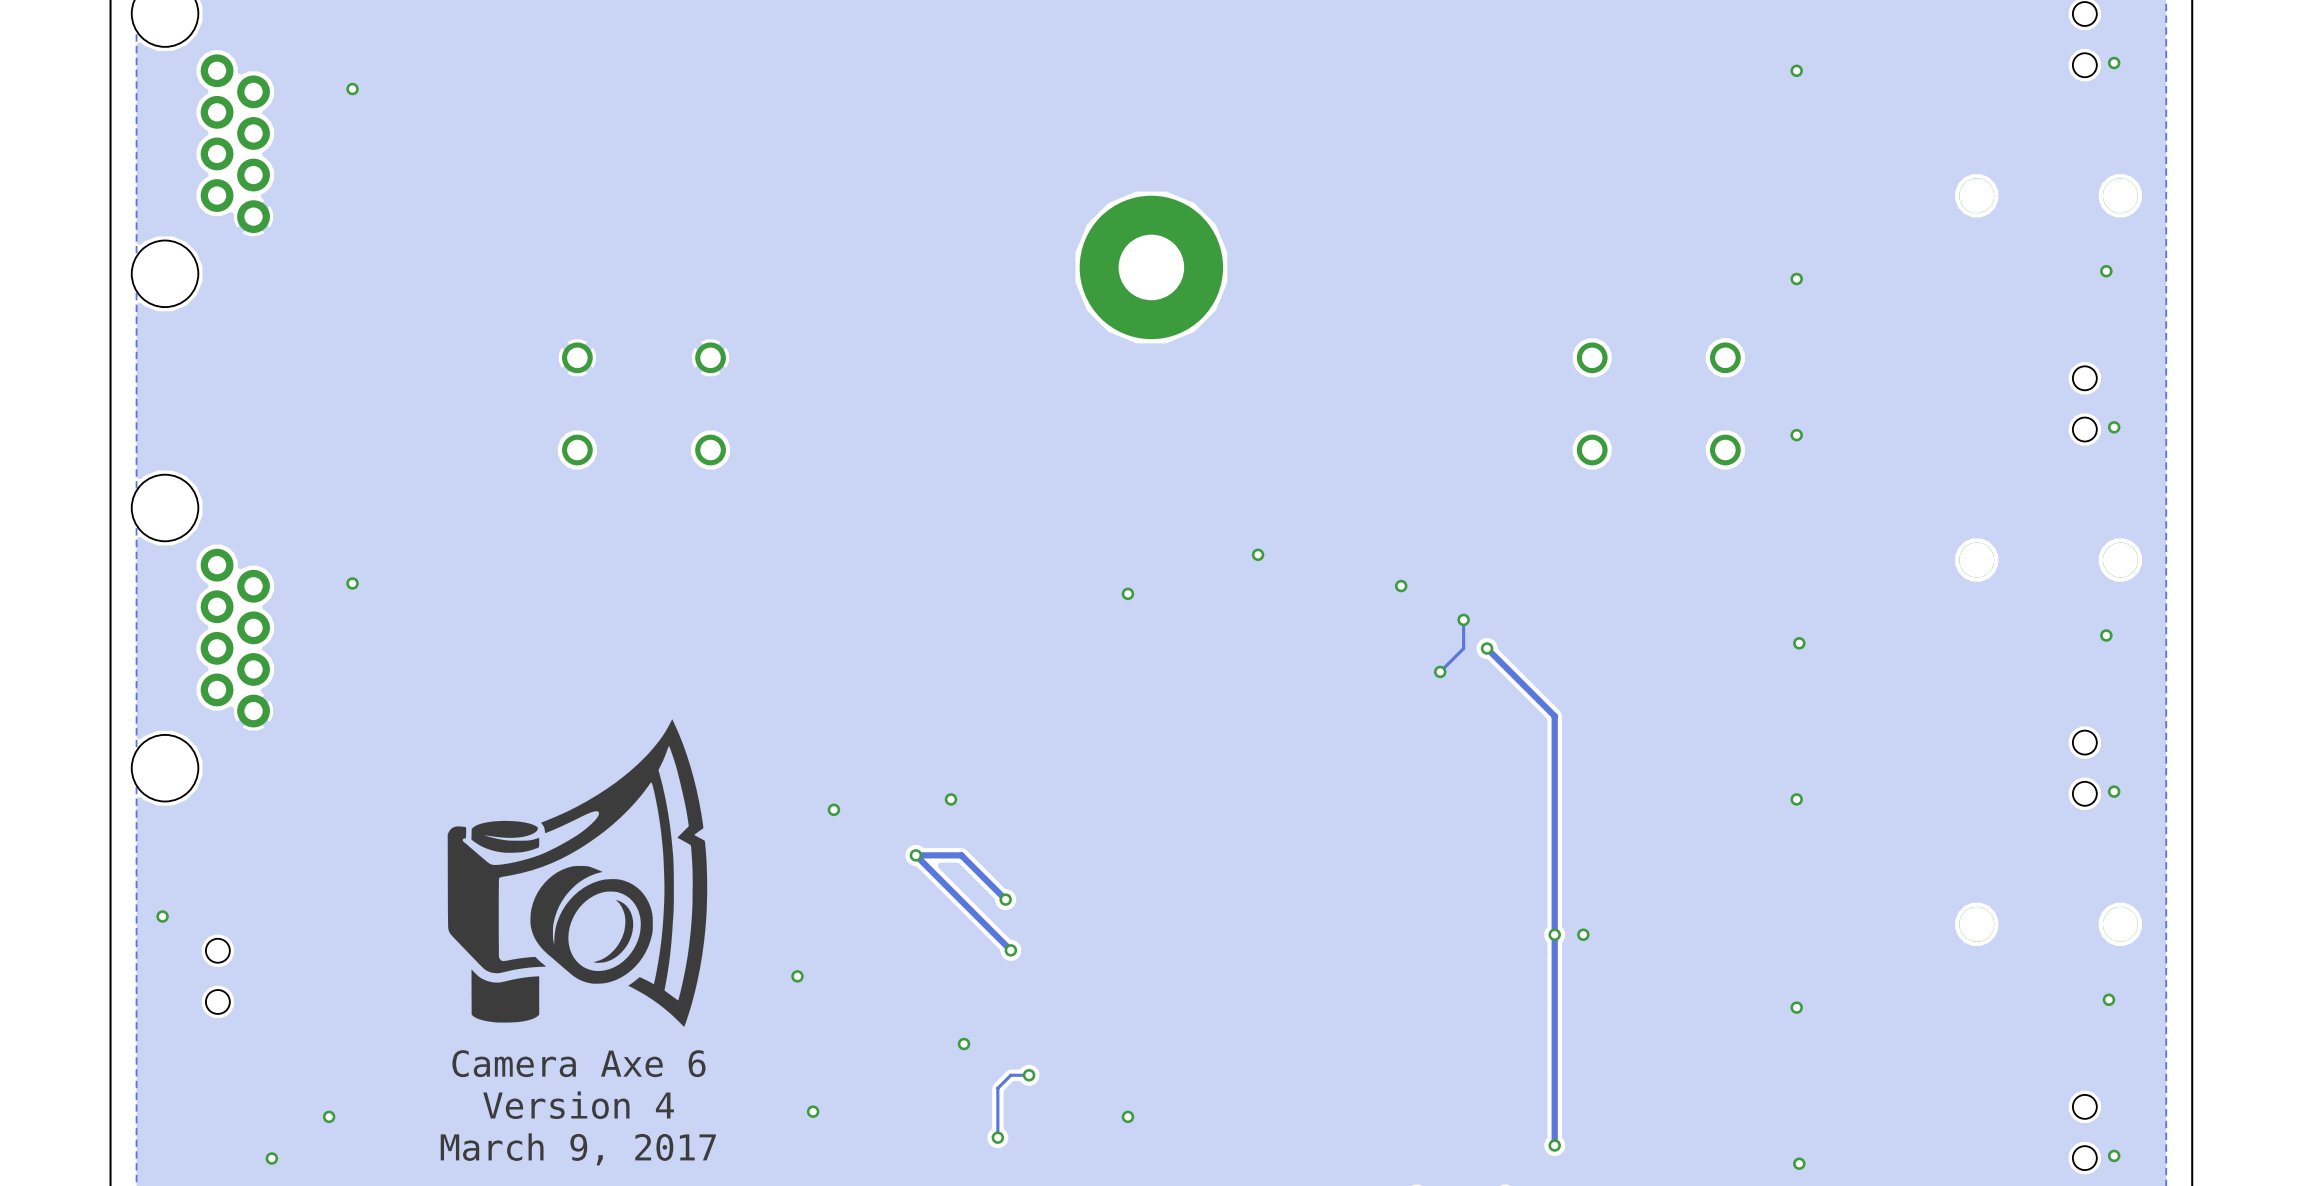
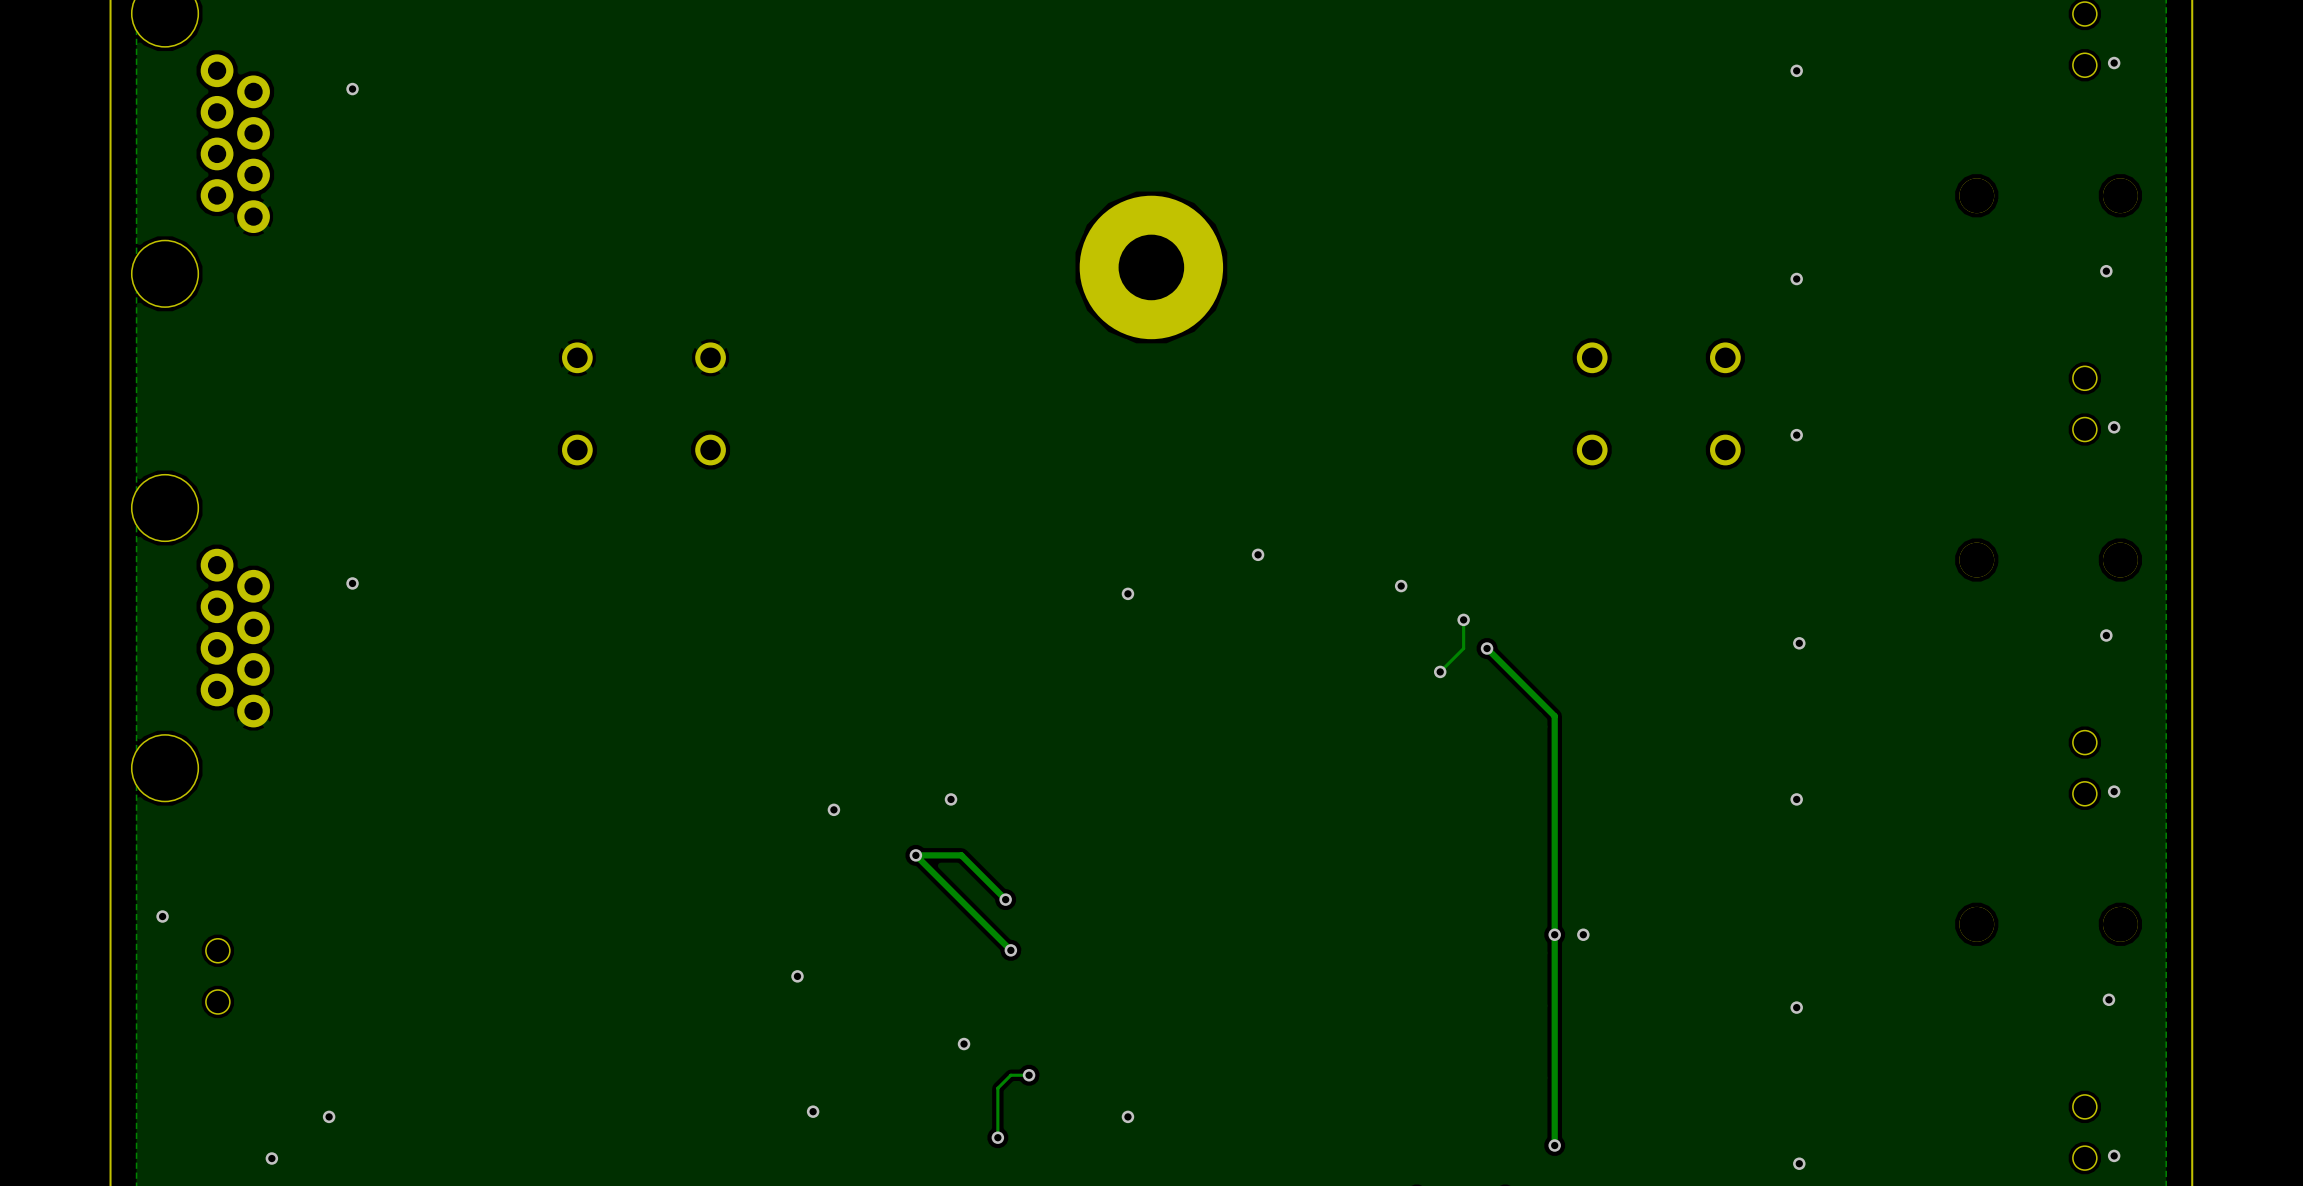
drawing: [447, 719, 708, 1027] -> none
text: Camera Axe 6 (578, 1063) -> none
text: Version 4 (578, 1105) -> none
text: March 9, 2017 (578, 1149) -> none

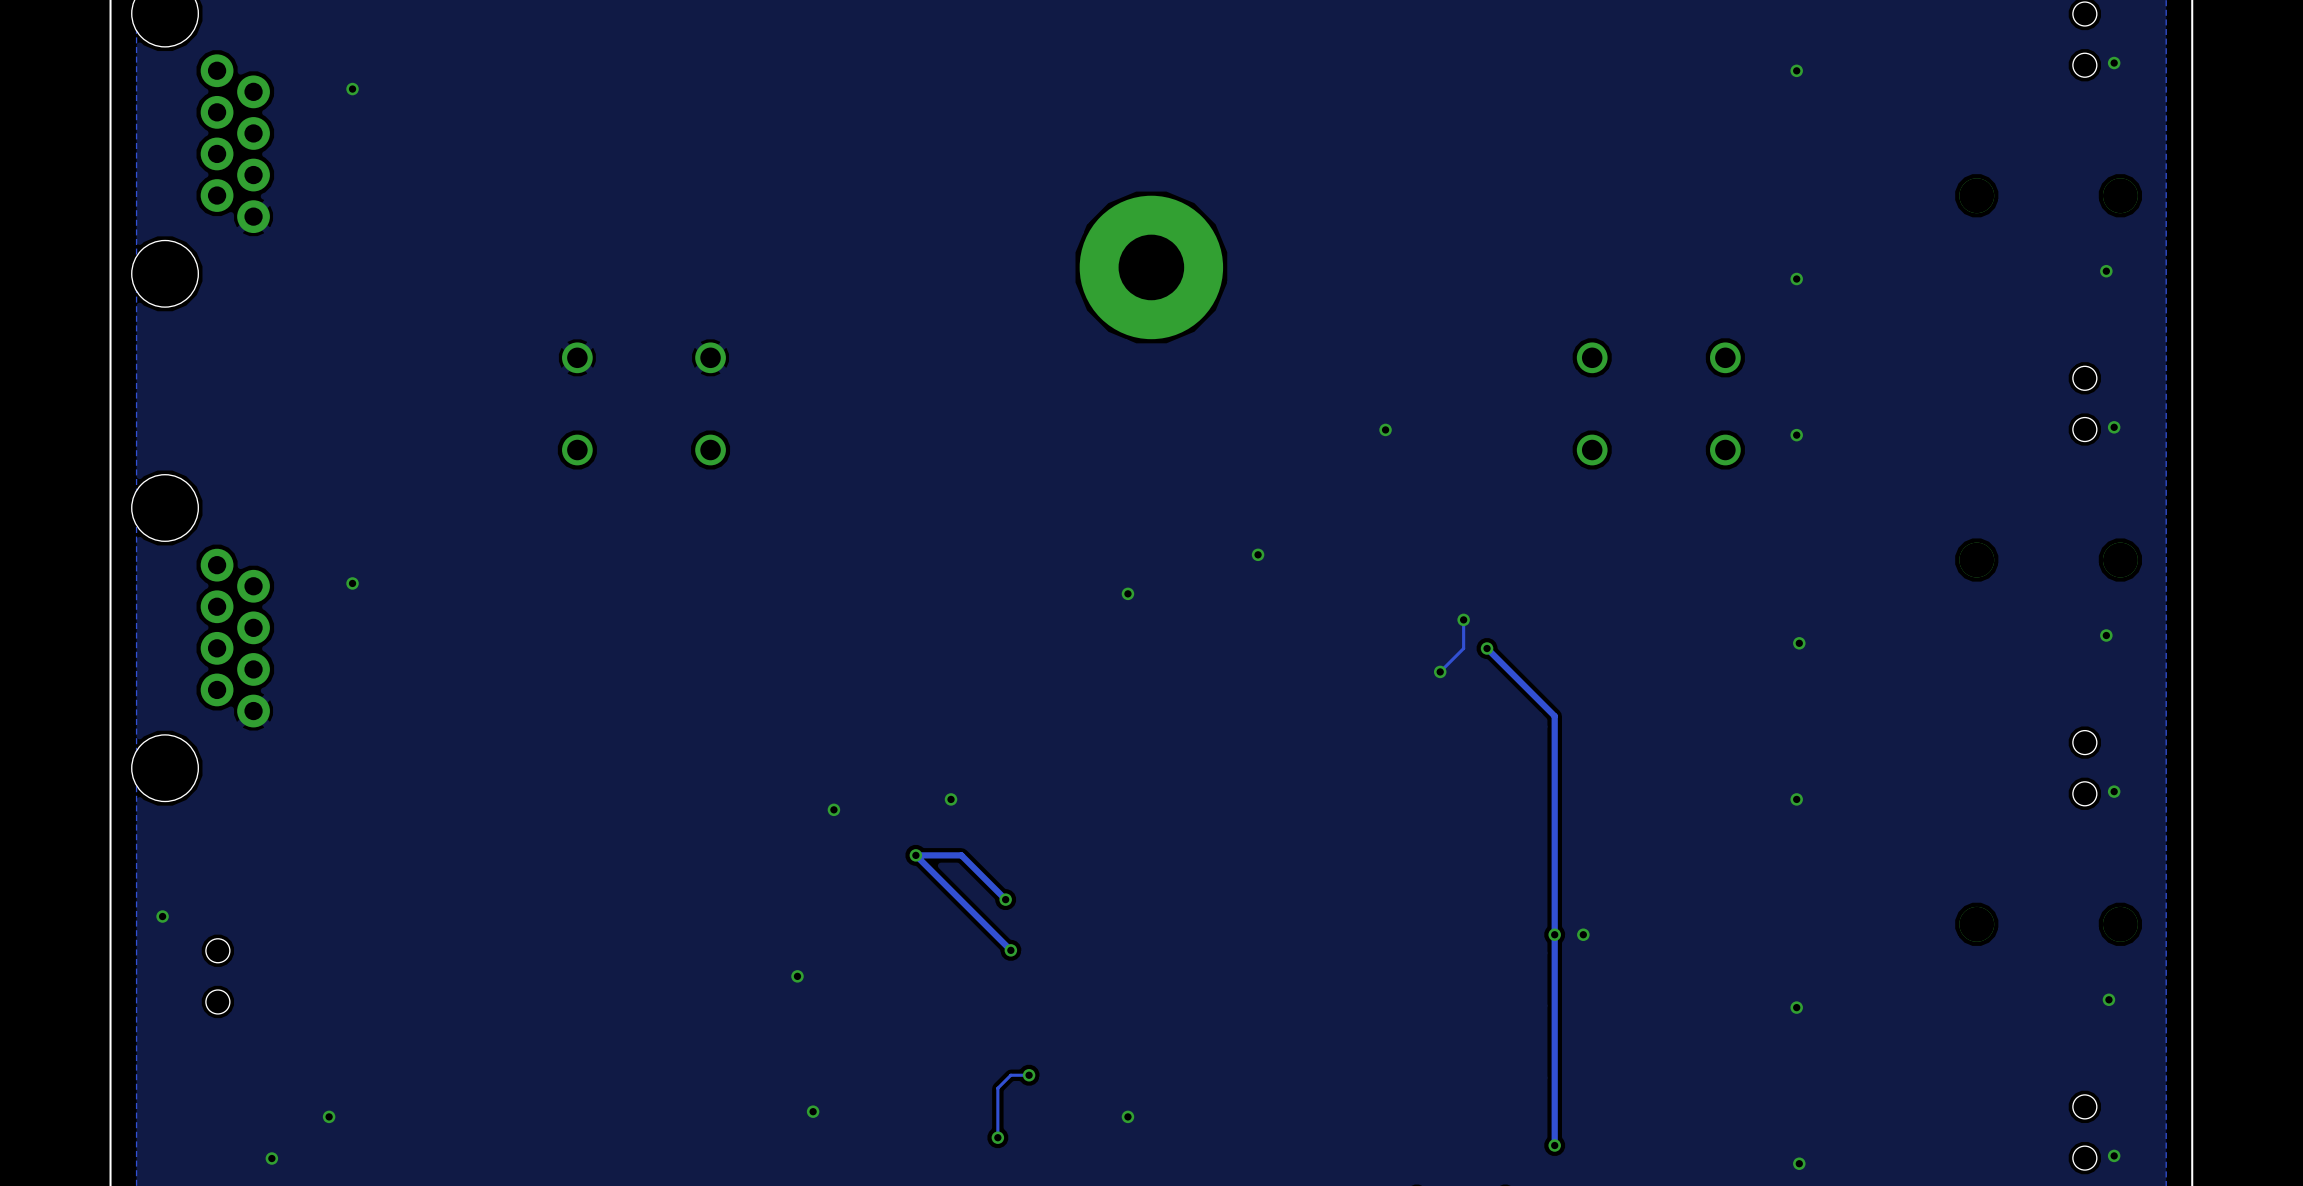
via: none -> (1385, 429)
via: (1401, 586) -> none
via: (964, 1044) -> none

